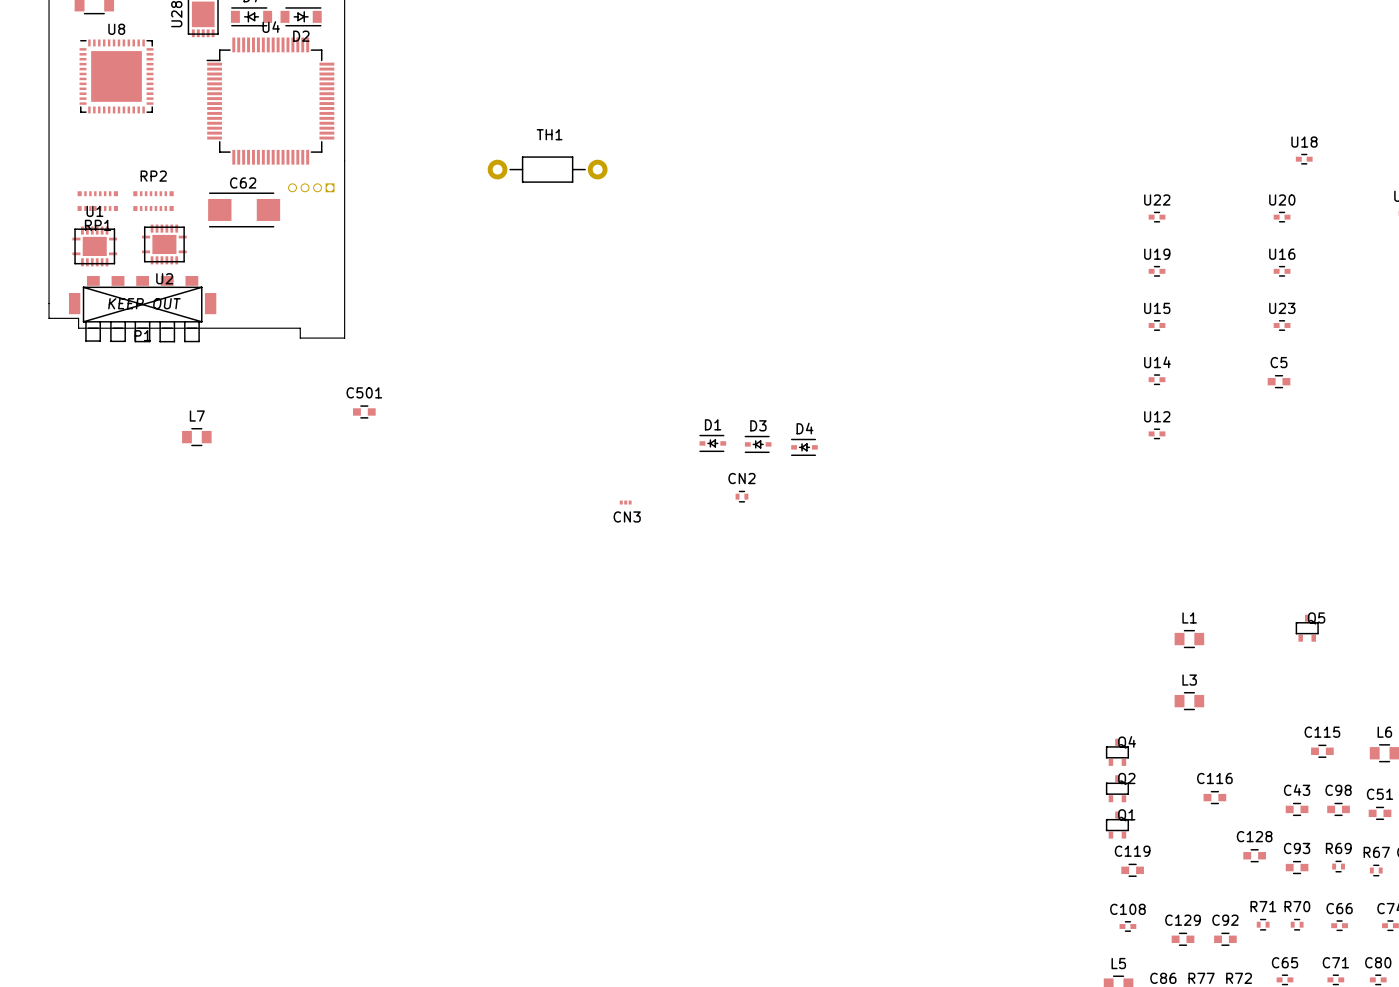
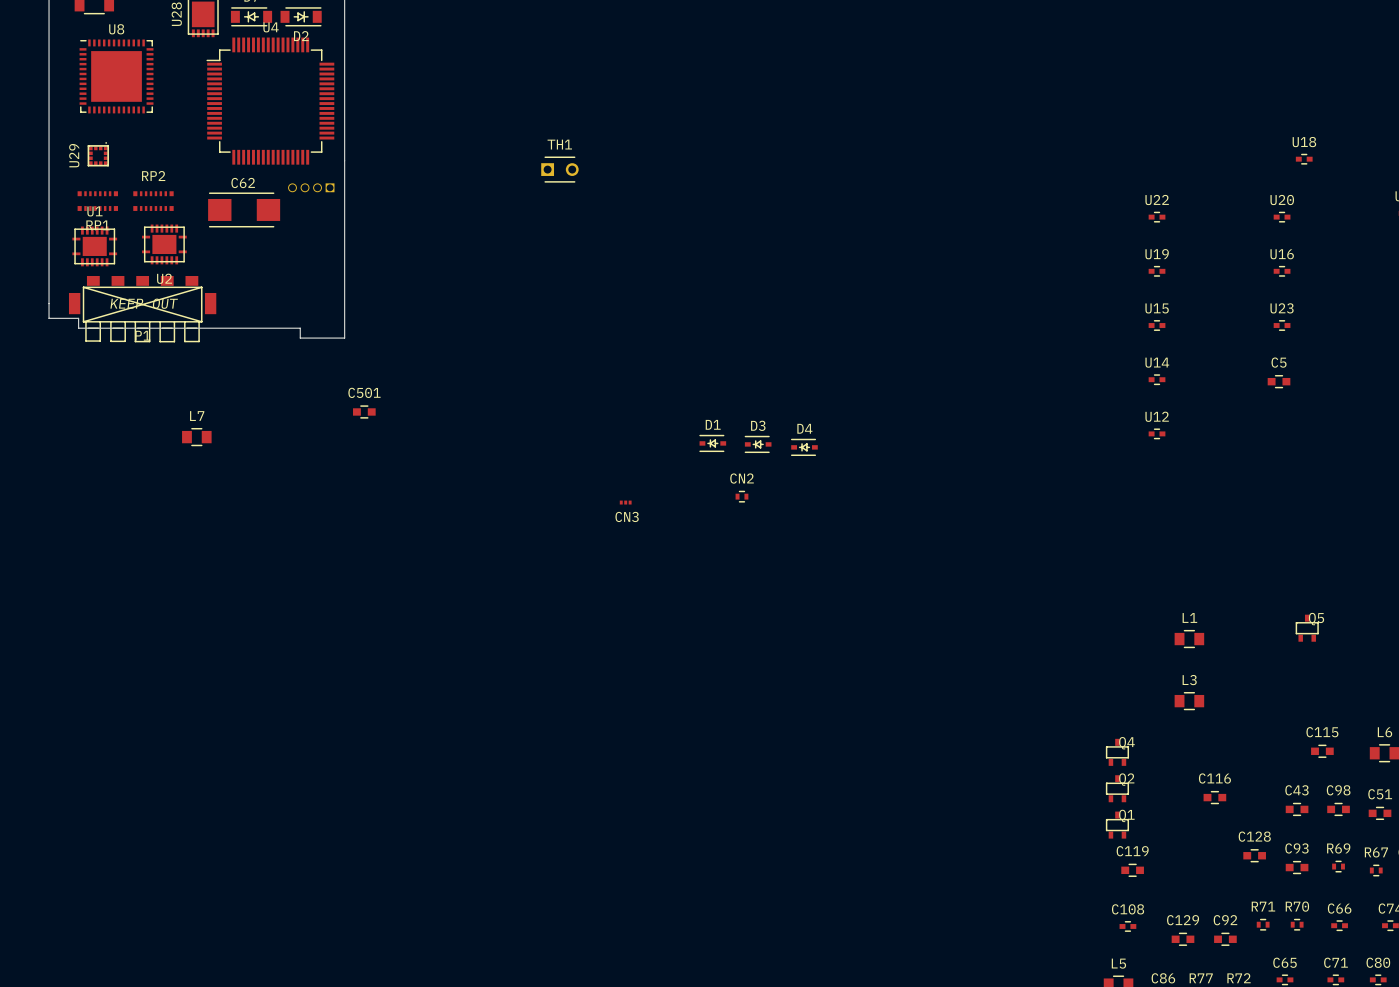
U29: none -> (98, 154)
TH1 footprint: [487, 156, 608, 183] -> [541, 156, 579, 183]

